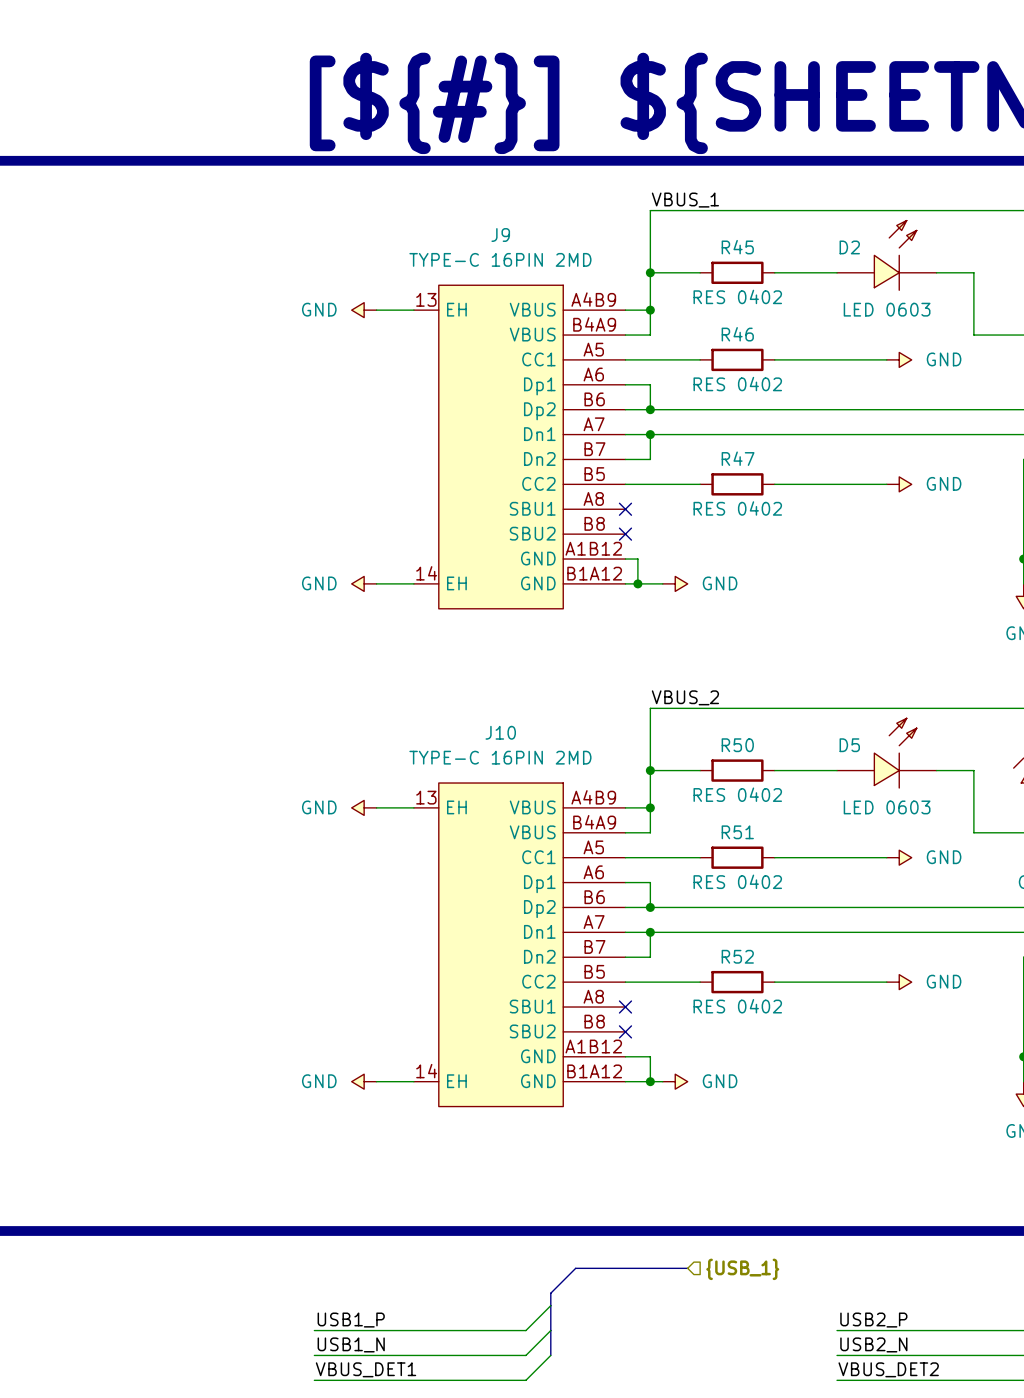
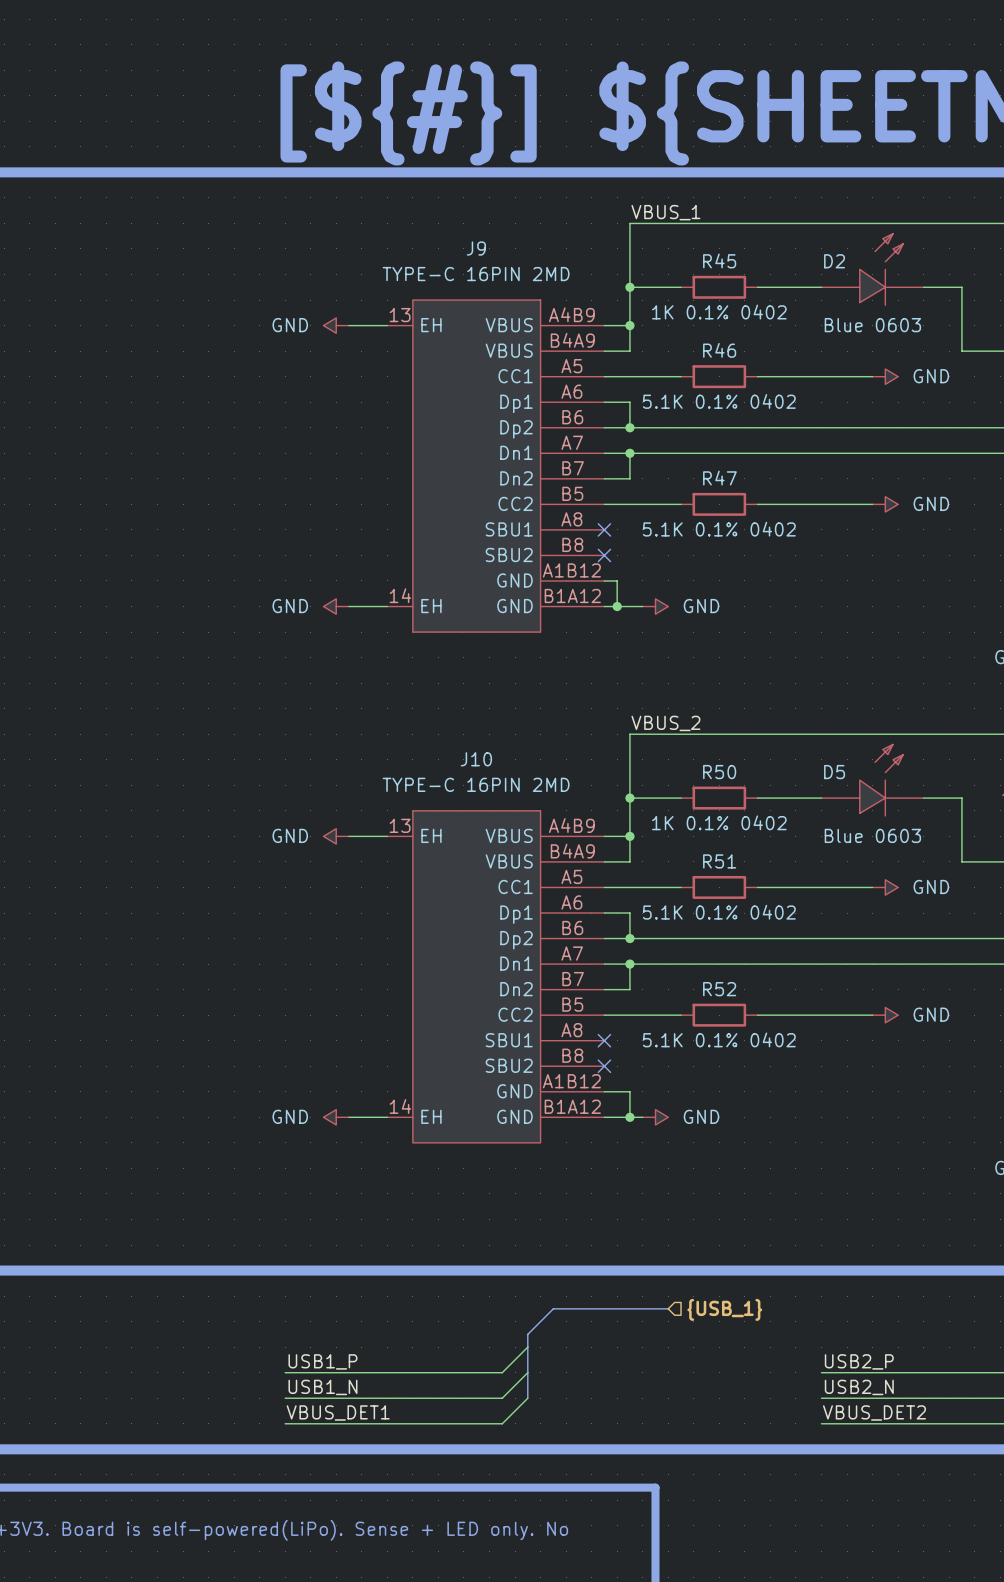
R45 value: RES 0402 (737, 296) -> 1K 0.1% 0402 (719, 312)
D2 value: LED 0603 (887, 309) -> Blue 0603 (872, 325)
R46 value: RES 0402 (737, 384) -> 5.1K 0.1% 0402 (719, 401)
R47 value: RES 0402 (737, 508) -> 5.1K 0.1% 0402 (719, 529)
R50 value: RES 0402 (737, 794) -> 1K 0.1% 0402 (719, 822)
D5 value: LED 0603 (887, 807) -> Blue 0603 (872, 835)
R51 value: RES 0402 (737, 881) -> 5.1K 0.1% 0402 (719, 912)
R52 value: RES 0402 (737, 1006) -> 5.1K 0.1% 0402 (719, 1039)

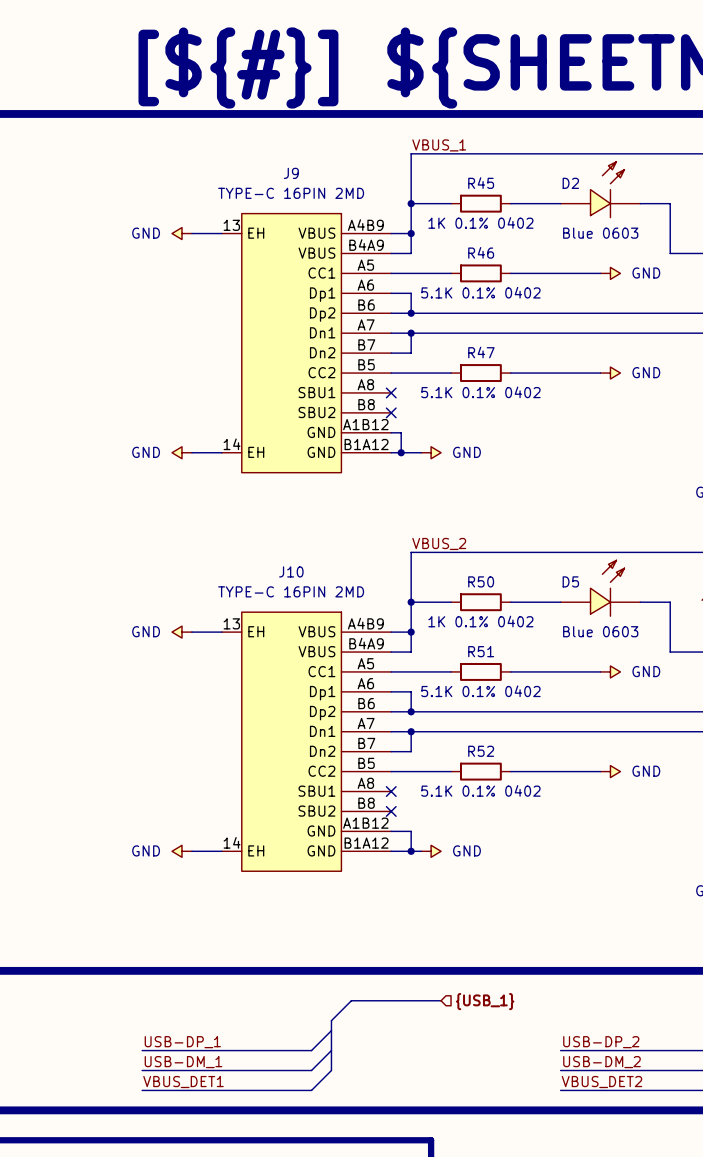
label: USB1_P (322, 1361) -> USB-DP_1 (182, 1042)
label: USB2_P (859, 1361) -> USB-DP_2 (601, 1042)
label: USB1_N (322, 1387) -> USB-DM_1 (183, 1062)
label: USB2_N (859, 1387) -> USB-DM_2 (601, 1062)

